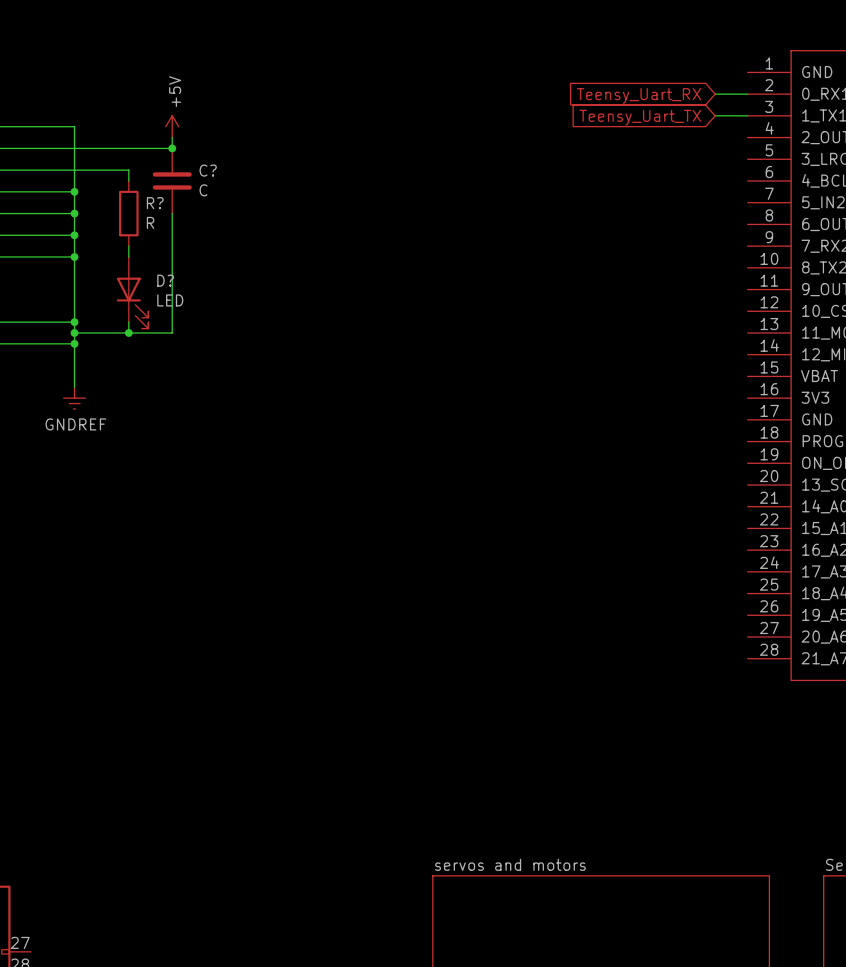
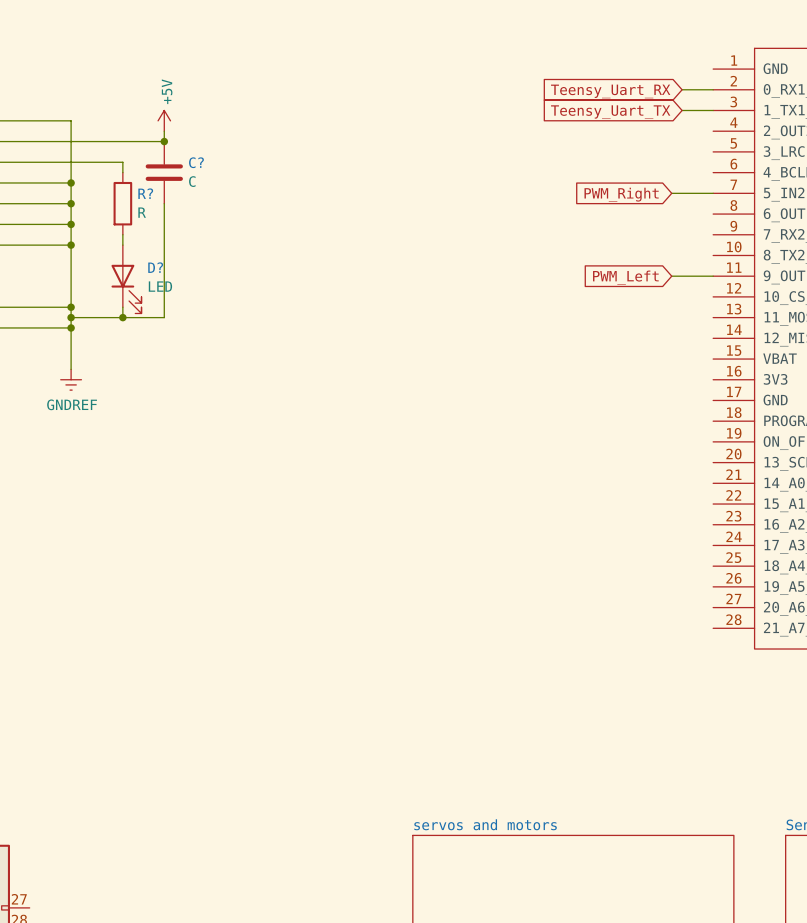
wire: none -> (671, 193) (713, 193)
global label: none -> PWM_Right (621, 194)
wire: none -> (671, 276) (713, 276)
global label: none -> PWM_Left (625, 277)

